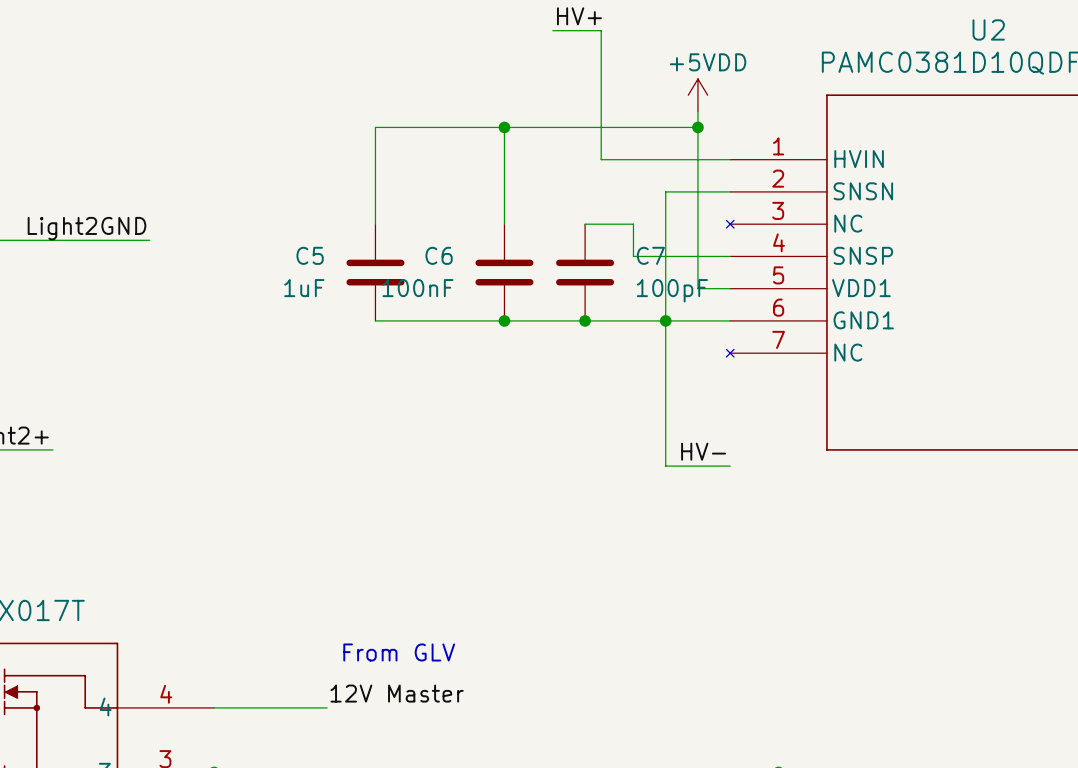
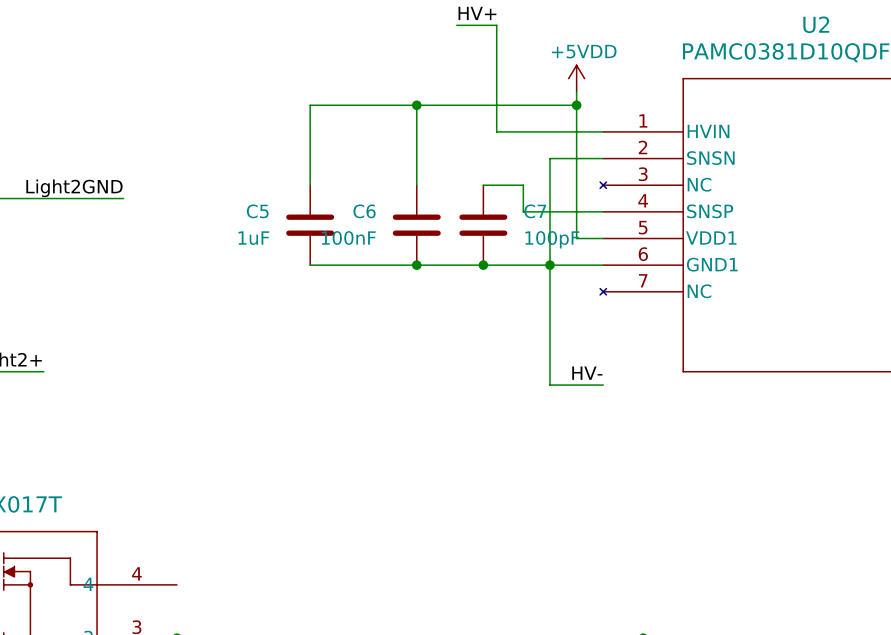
text: From GLV (399, 652) -> none
label: 12V Master (397, 693) -> none
wire: (214, 707) (327, 707) -> none

